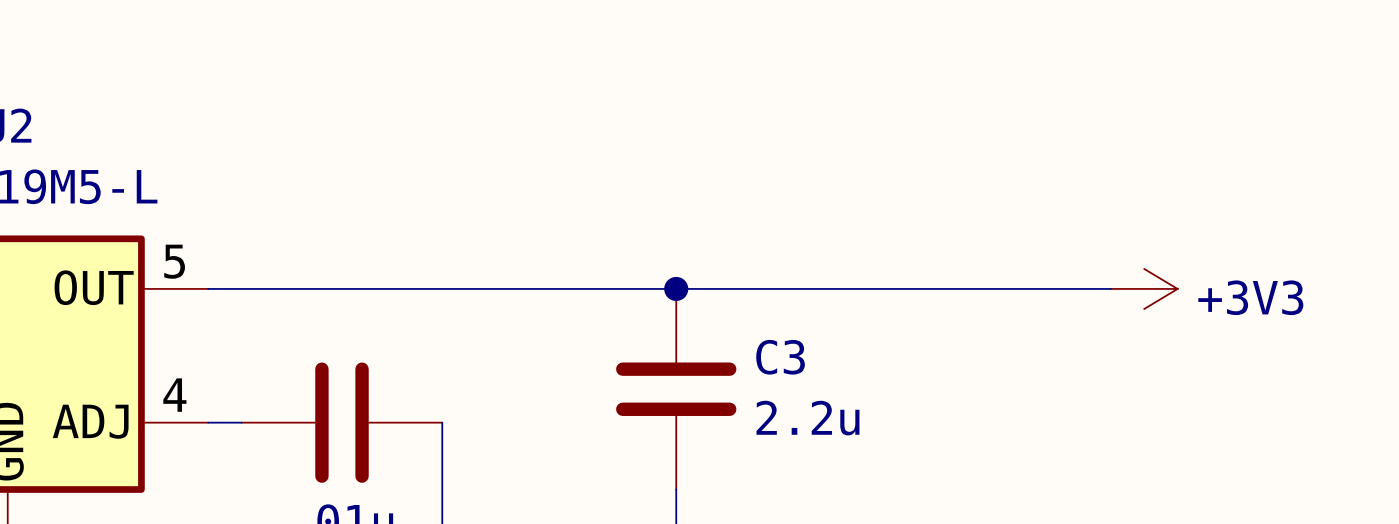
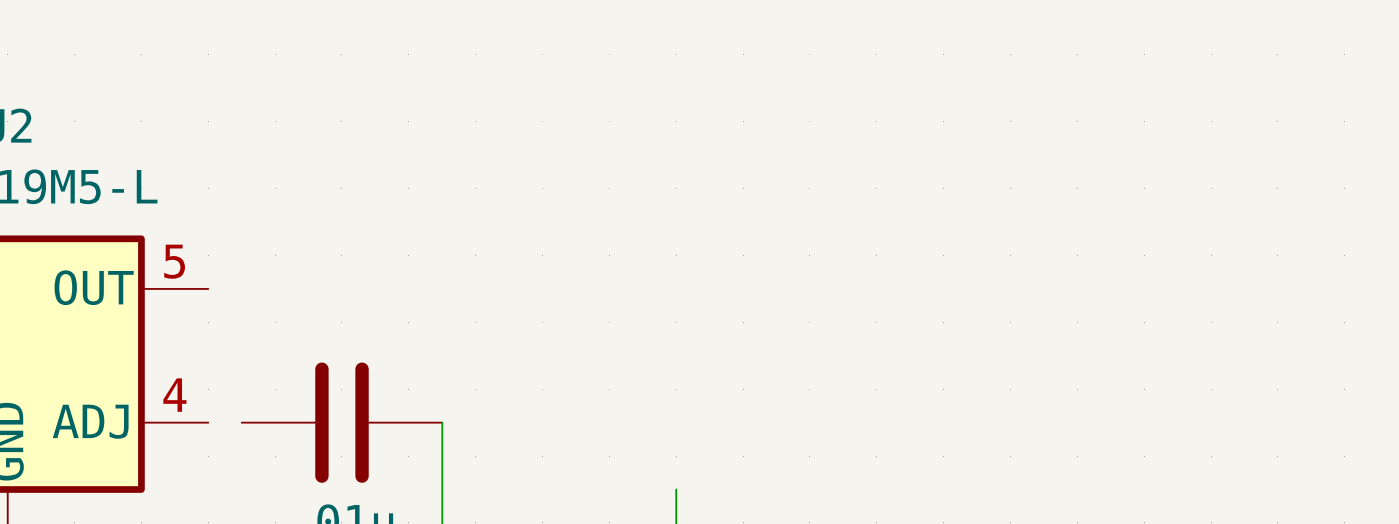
wire: (208, 288) (1110, 288) -> none
junction: (676, 288) -> none
power symbol: +3V3 (1144, 288) -> none
C3: 2.2u (676, 389) -> none
wire: (208, 422) (241, 422) -> none

